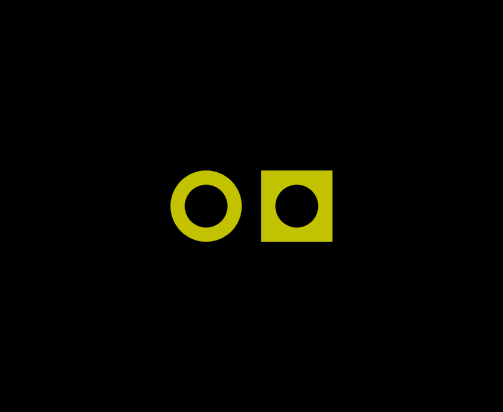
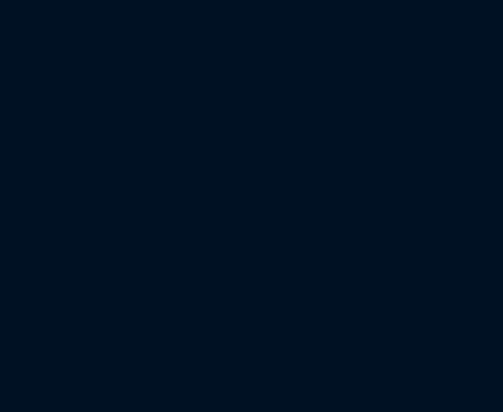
part: (251, 206) -> none

